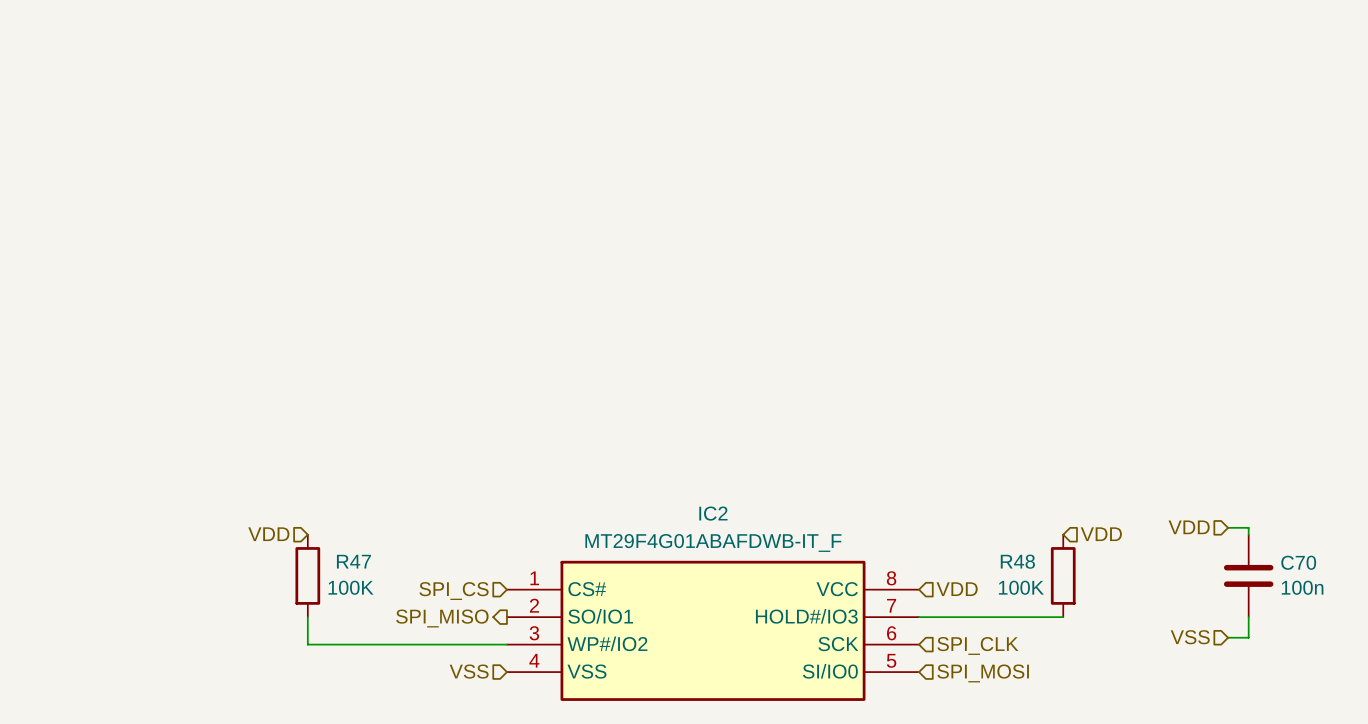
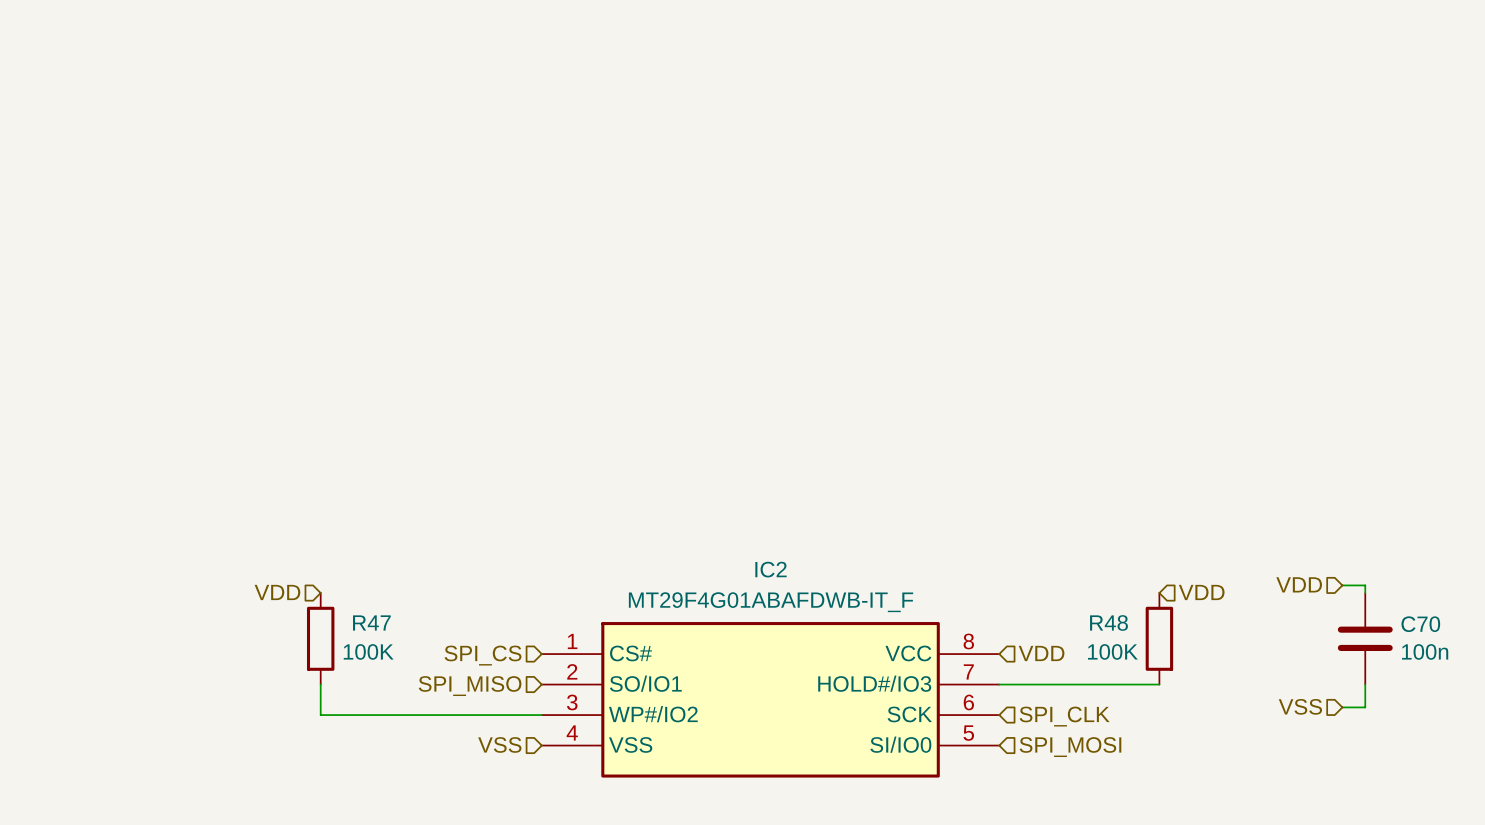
hierarchical label shape: output (442, 618) -> input (470, 686)

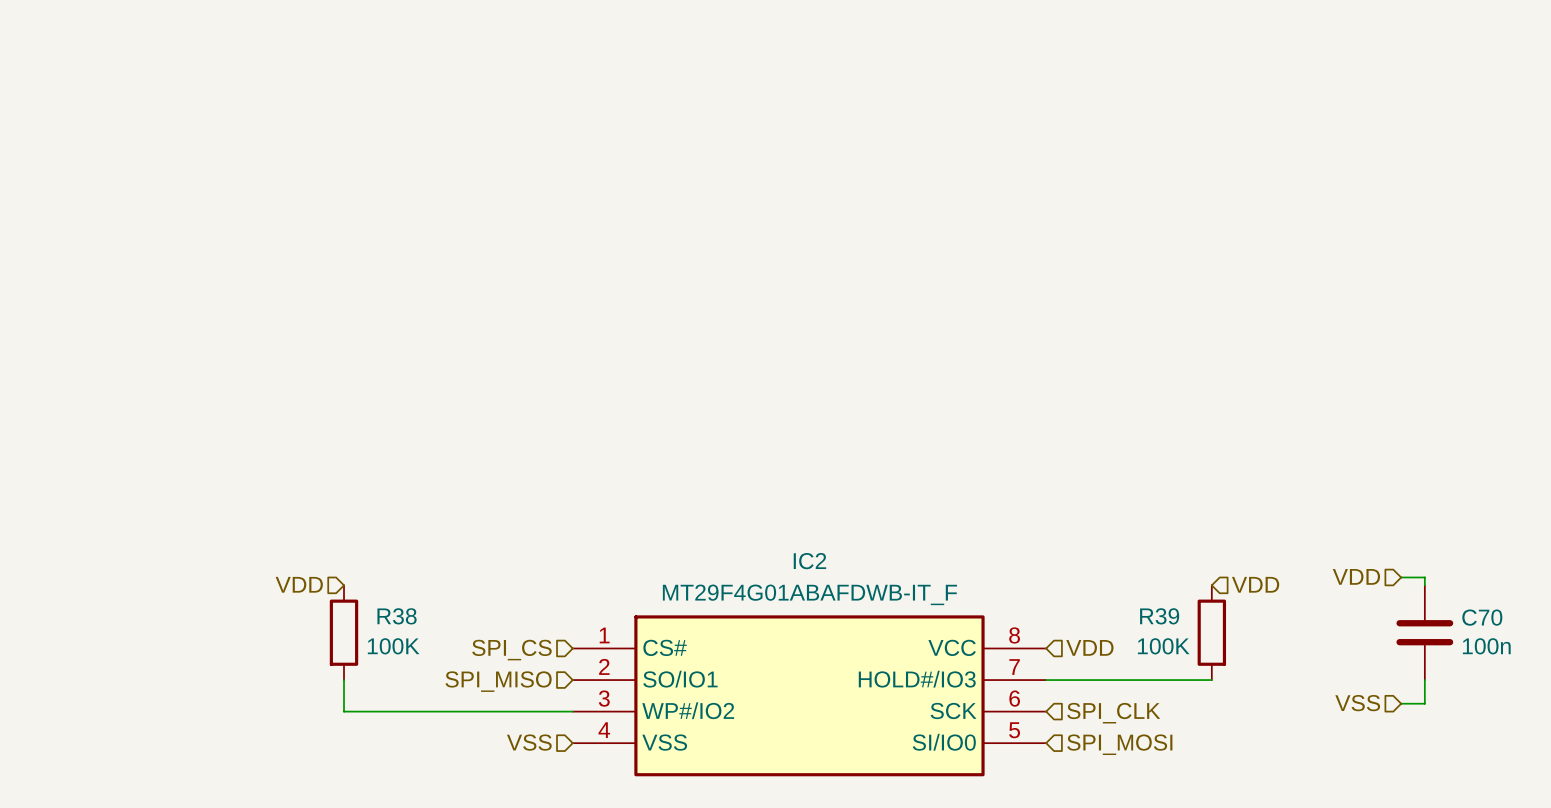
R47 name: R47 (371, 622) -> R38 (397, 616)
R48 name: R48 (1109, 622) -> R39 (1159, 616)

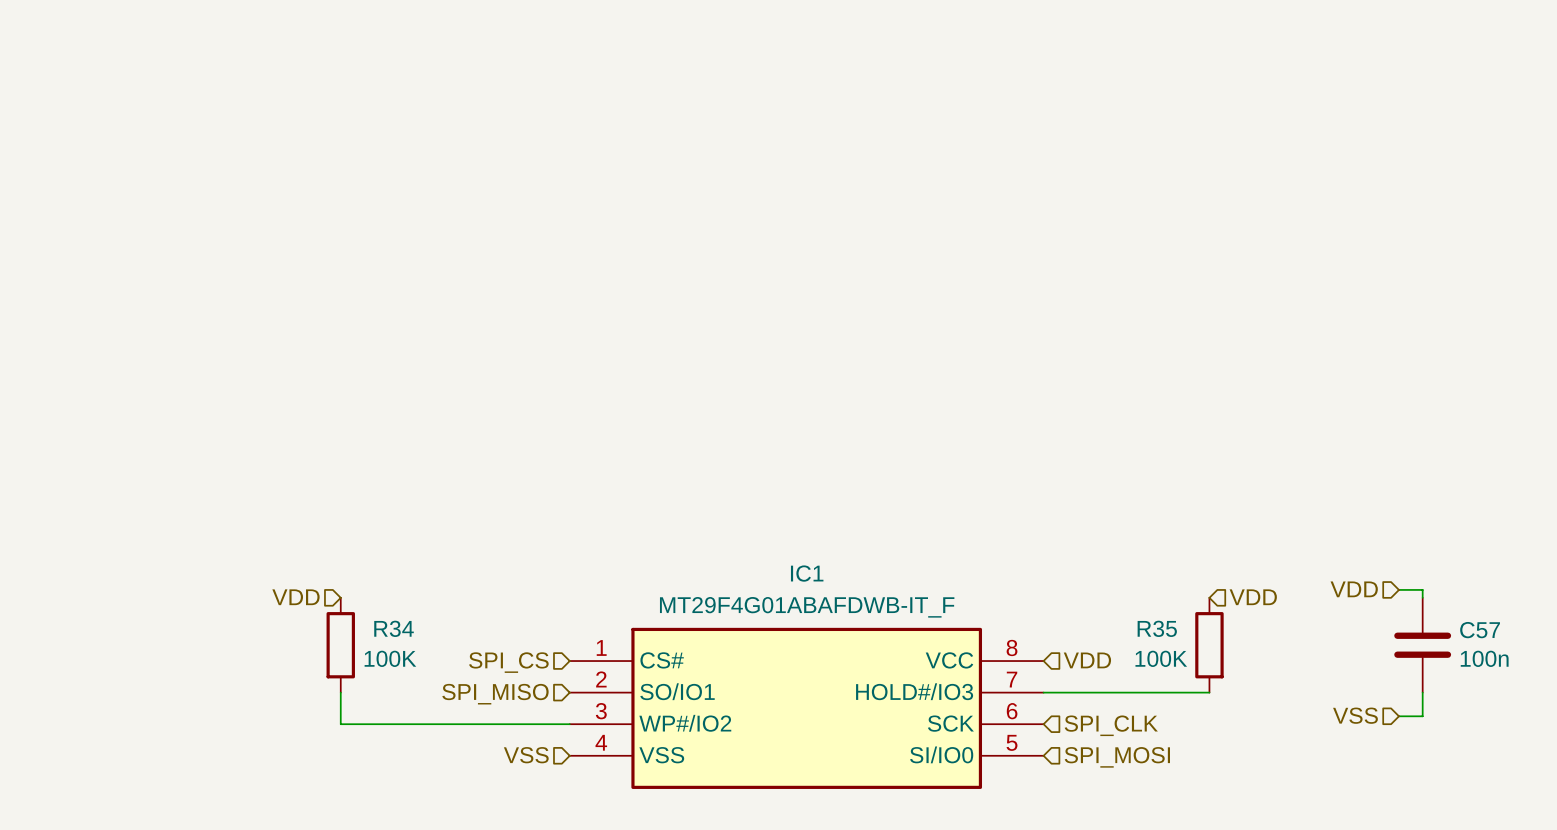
IC2 name: IC2 (809, 561) -> IC1 (807, 573)
R38 name: R38 (397, 616) -> R34 (394, 628)
R39 name: R39 (1159, 616) -> R35 (1157, 628)
C70 name: C70 (1482, 617) -> C57 (1480, 630)

